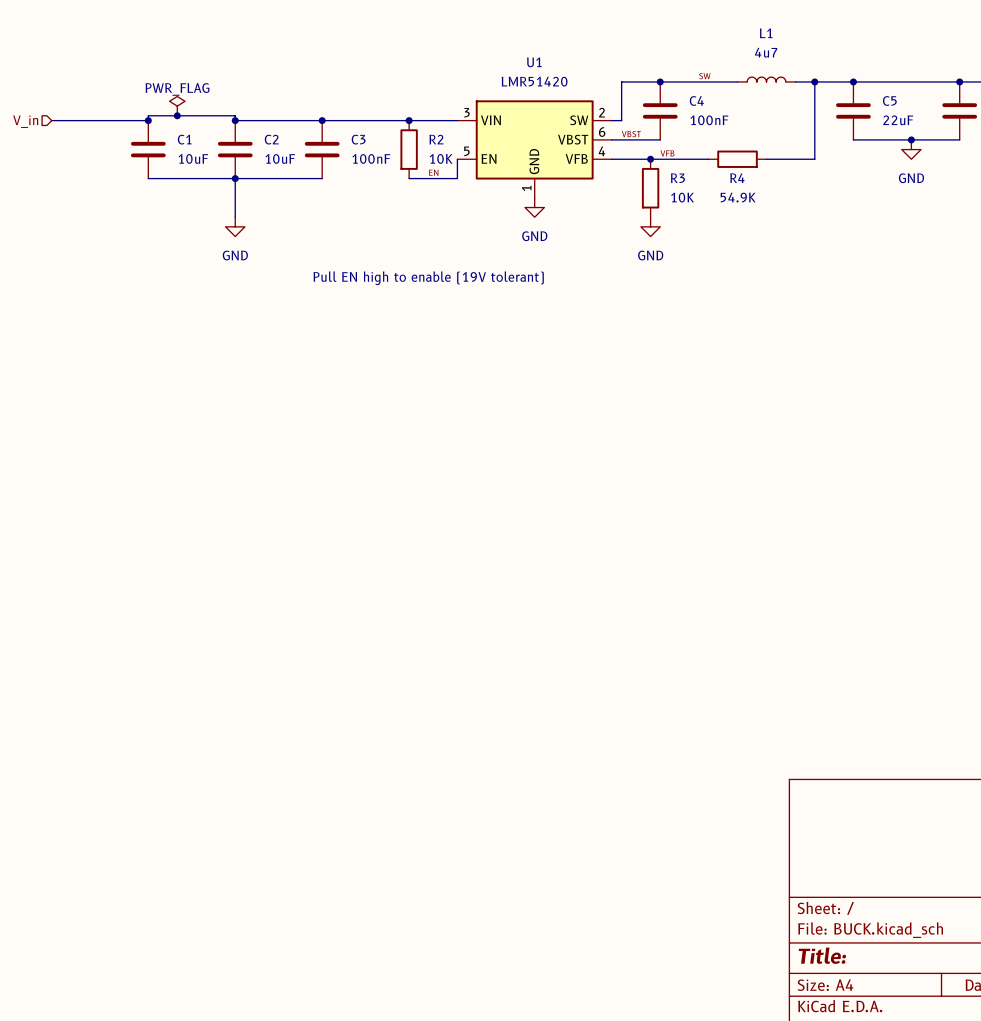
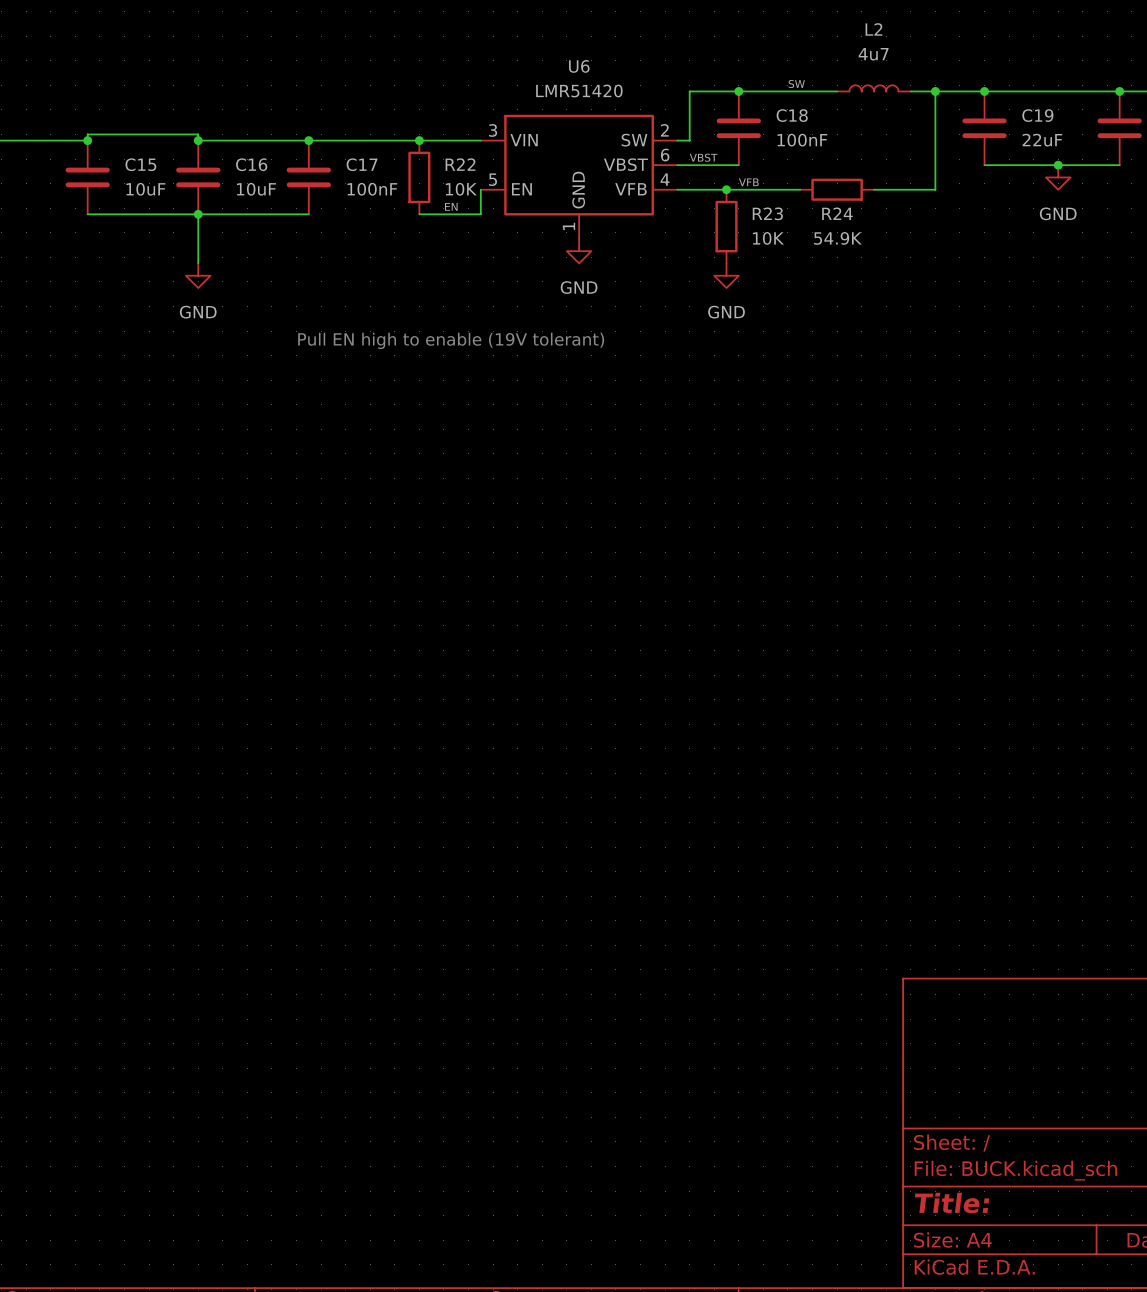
L1 name: L1 (766, 33) -> L2 (873, 29)
U1 name: U1 (534, 62) -> U6 (579, 66)
C4 name: C4 (696, 100) -> C18 (792, 115)
C5 name: C5 (889, 101) -> C19 (1037, 115)
power symbol: PWR_FLAG (177, 106) -> none
junction: (177, 115) -> none
C1 name: C1 (184, 139) -> C15 (140, 164)
C2 name: C2 (271, 139) -> C16 (251, 164)
C3 name: C3 (358, 139) -> C17 (362, 164)
R2 name: R2 (436, 139) -> R22 (460, 164)
R3 name: R3 (677, 178) -> R23 (767, 213)
R4 name: R4 (737, 178) -> R24 (837, 213)

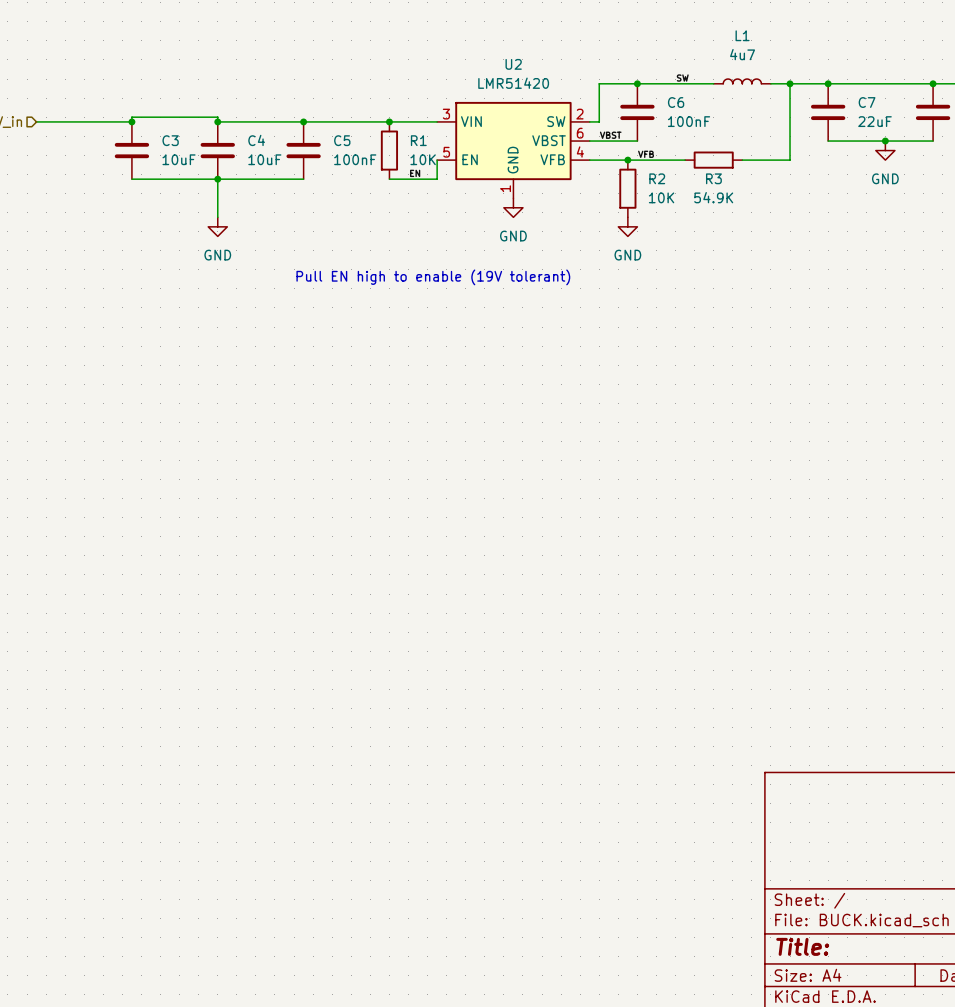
L2 name: L2 (873, 29) -> L1 (742, 35)
U6 name: U6 (579, 66) -> U2 (513, 64)
C18 name: C18 (792, 115) -> C6 (676, 102)
C19 name: C19 (1037, 115) -> C7 (867, 102)
C15 name: C15 (140, 164) -> C3 (170, 140)
C16 name: C16 (251, 164) -> C4 (256, 140)
C17 name: C17 (362, 164) -> C5 (342, 140)
R22 name: R22 (460, 164) -> R1 (418, 140)
R23 name: R23 (767, 213) -> R2 (657, 178)
R24 name: R24 (837, 213) -> R3 (713, 178)

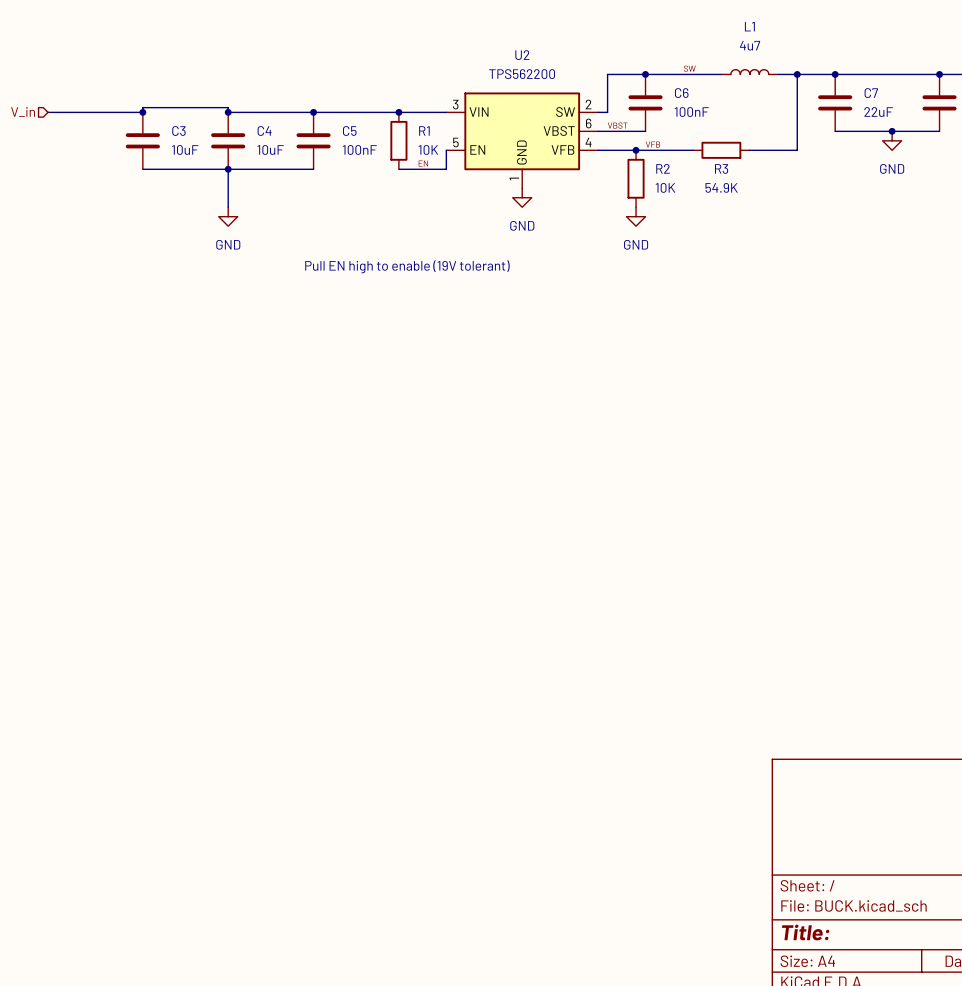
U2 value: LMR51420 (513, 83) -> TPS562200 (522, 74)

